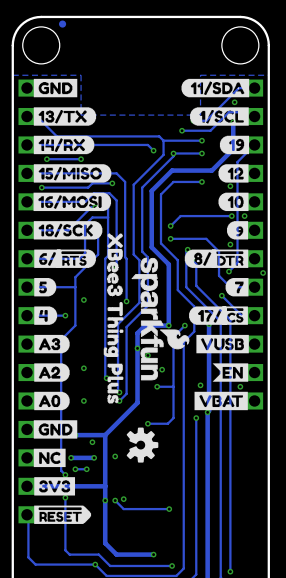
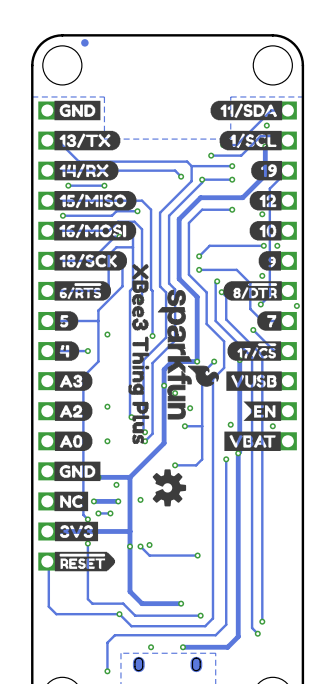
drawing: none -> [54, 281, 111, 301]
drawing: [34, 249, 96, 268] -> none
drawing: [184, 249, 216, 268] -> none
drawing shape: [211, 249, 249, 268] -> [223, 281, 282, 301]
drawing: [189, 306, 248, 325] -> none
drawing: none -> [227, 341, 282, 361]

